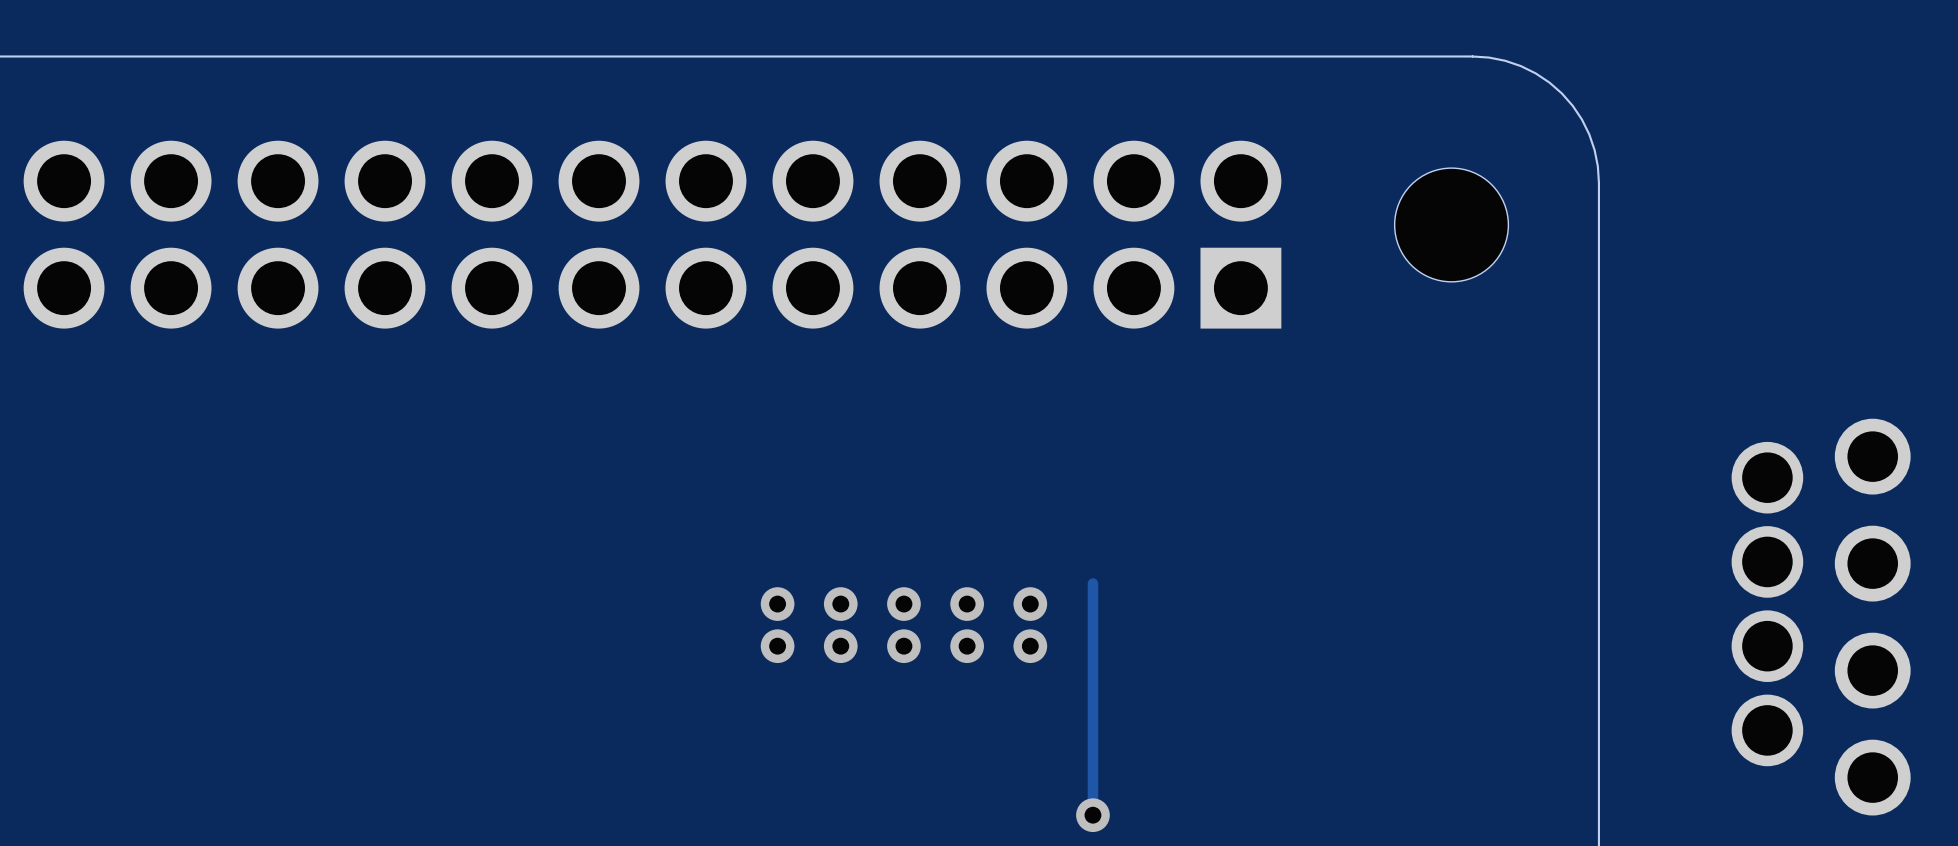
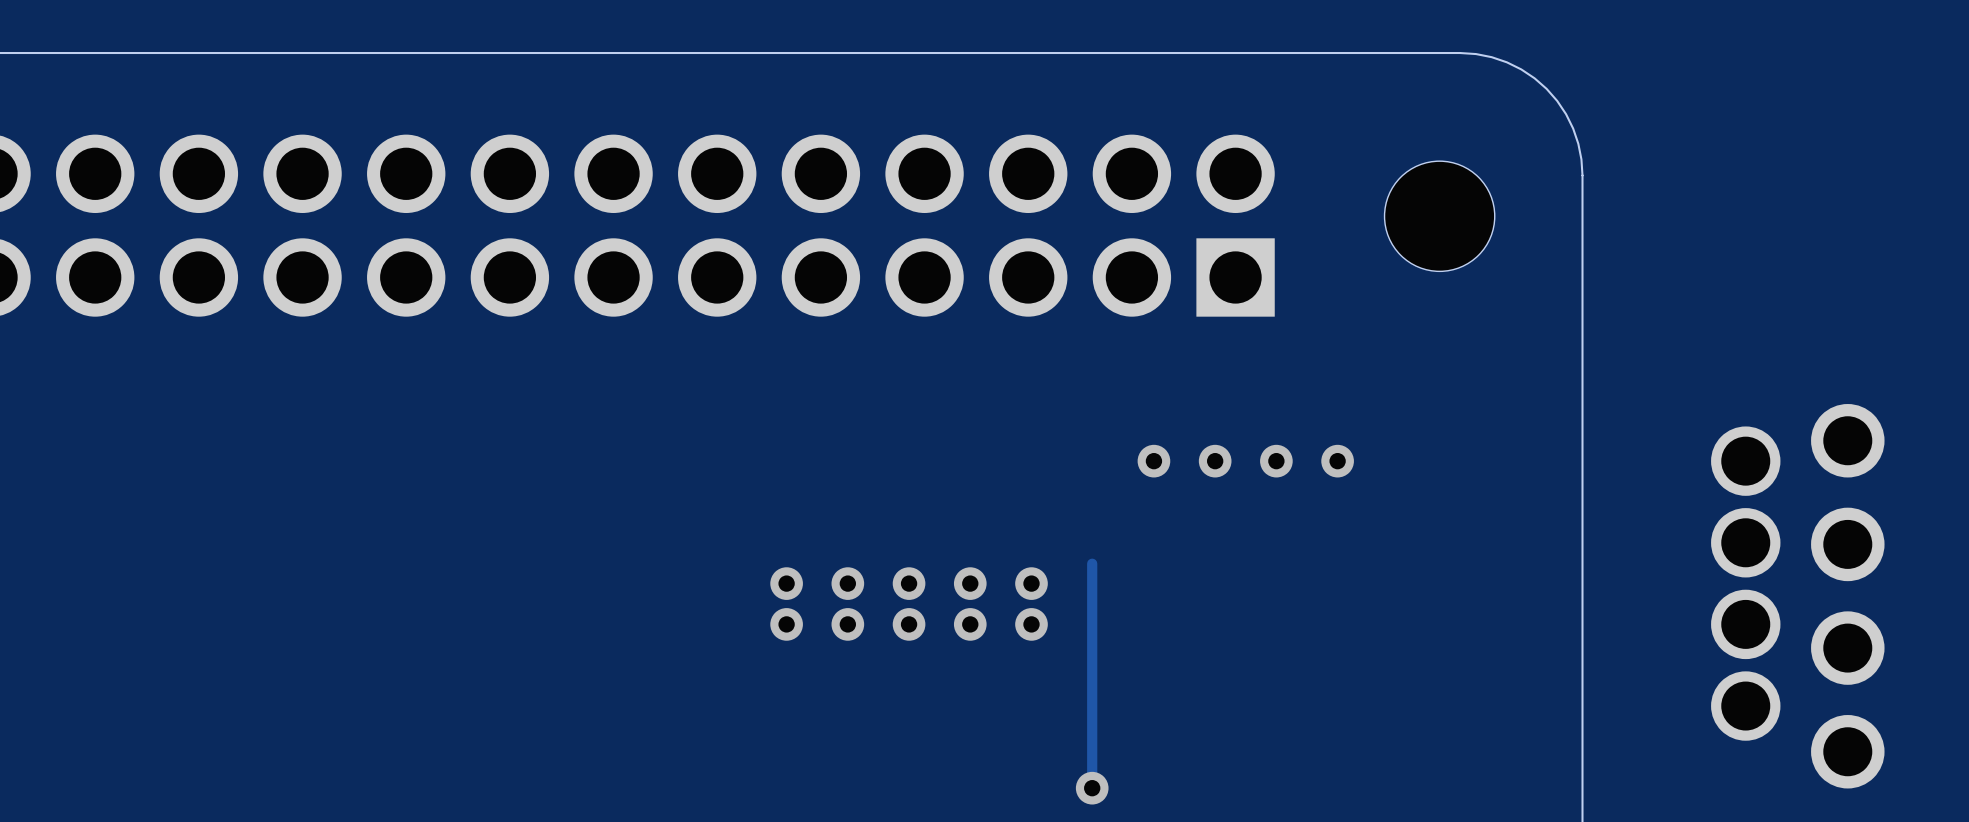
via: none -> (1153, 461)
via: none -> (1215, 461)
via: none -> (1276, 461)
via: none -> (1337, 461)

